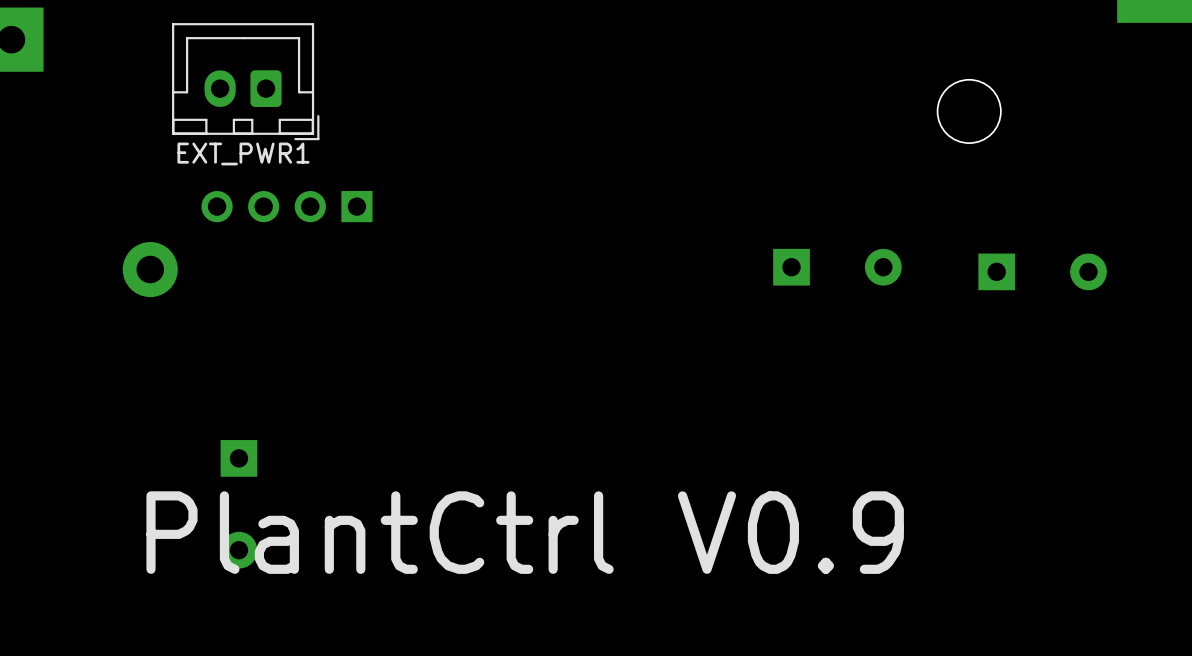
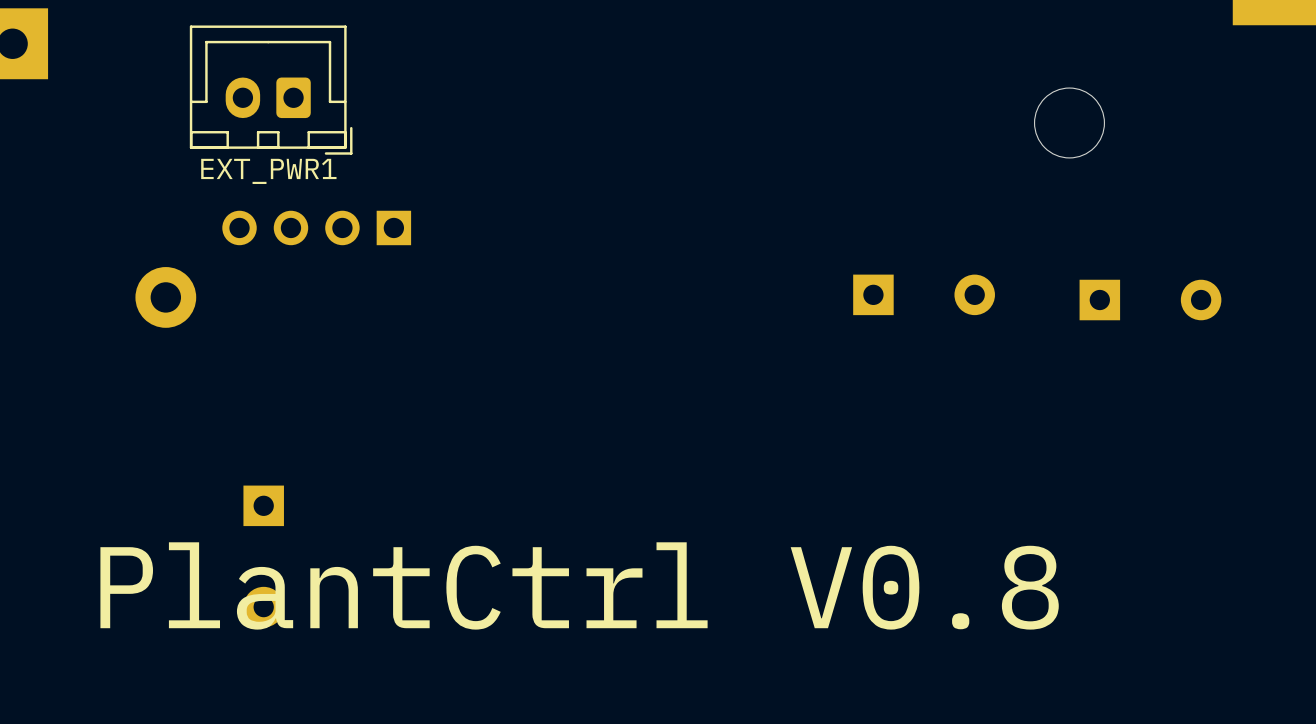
text: PlantCtrl V0.9 (525, 532) -> PlantCtrl V0.8 (579, 585)

